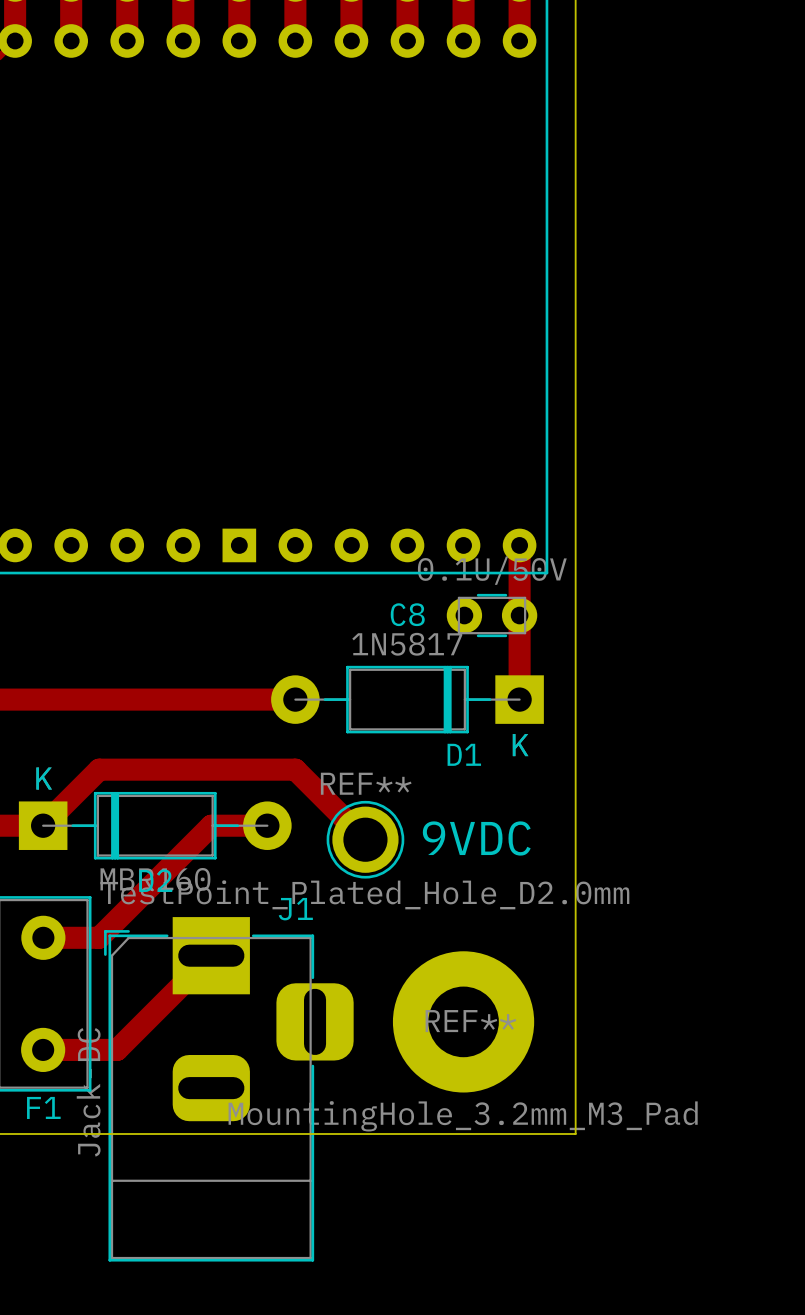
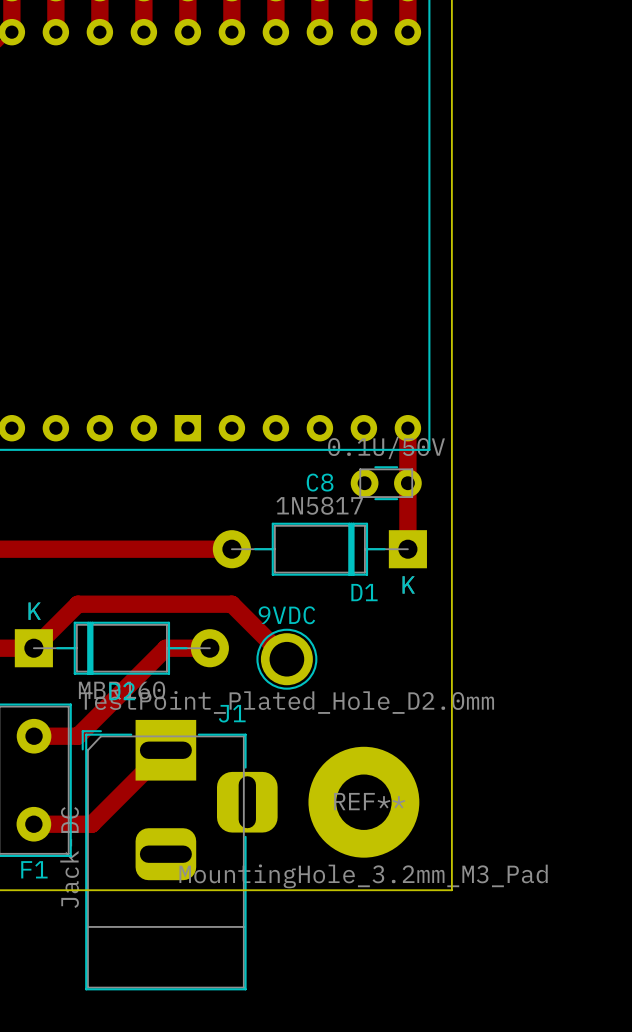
REF** name: REF** (366, 783) -> 9VDC (286, 615)
text: 9VDC (476, 838) -> none

